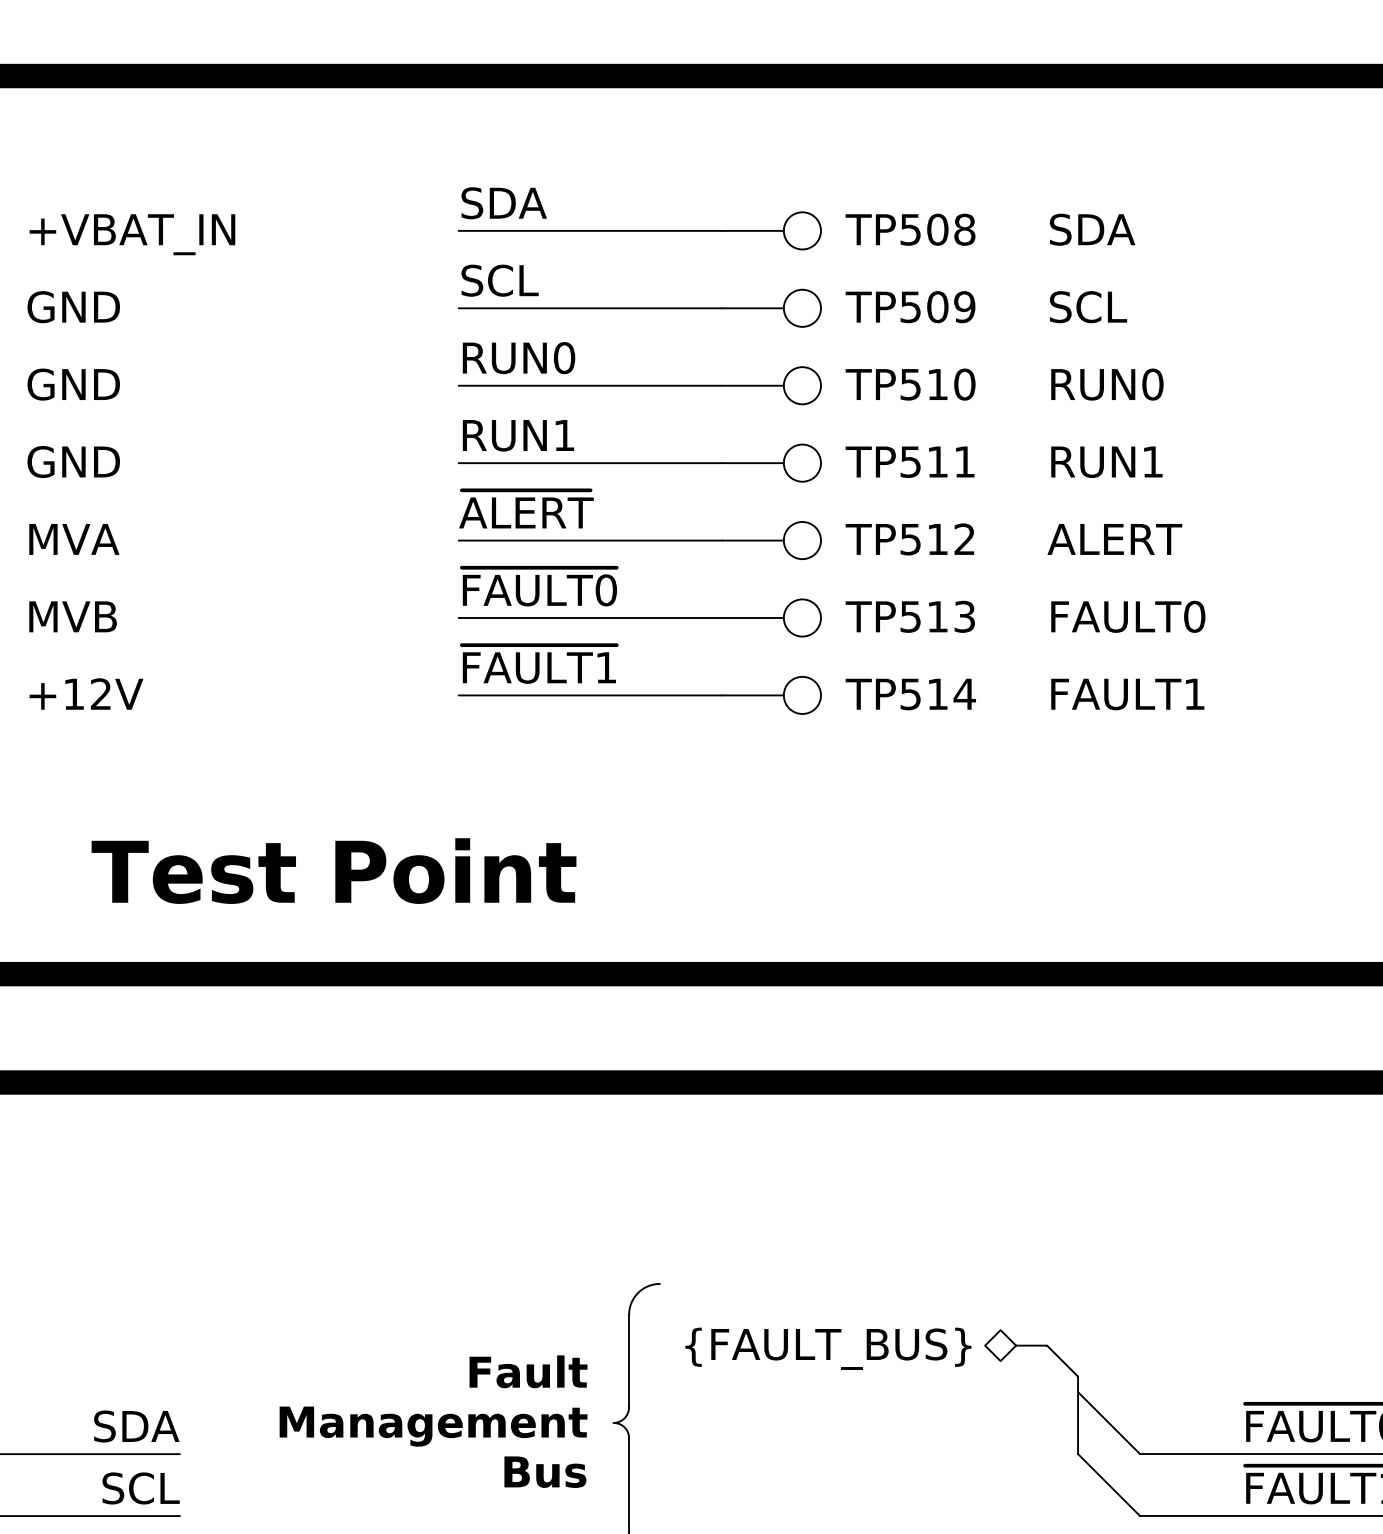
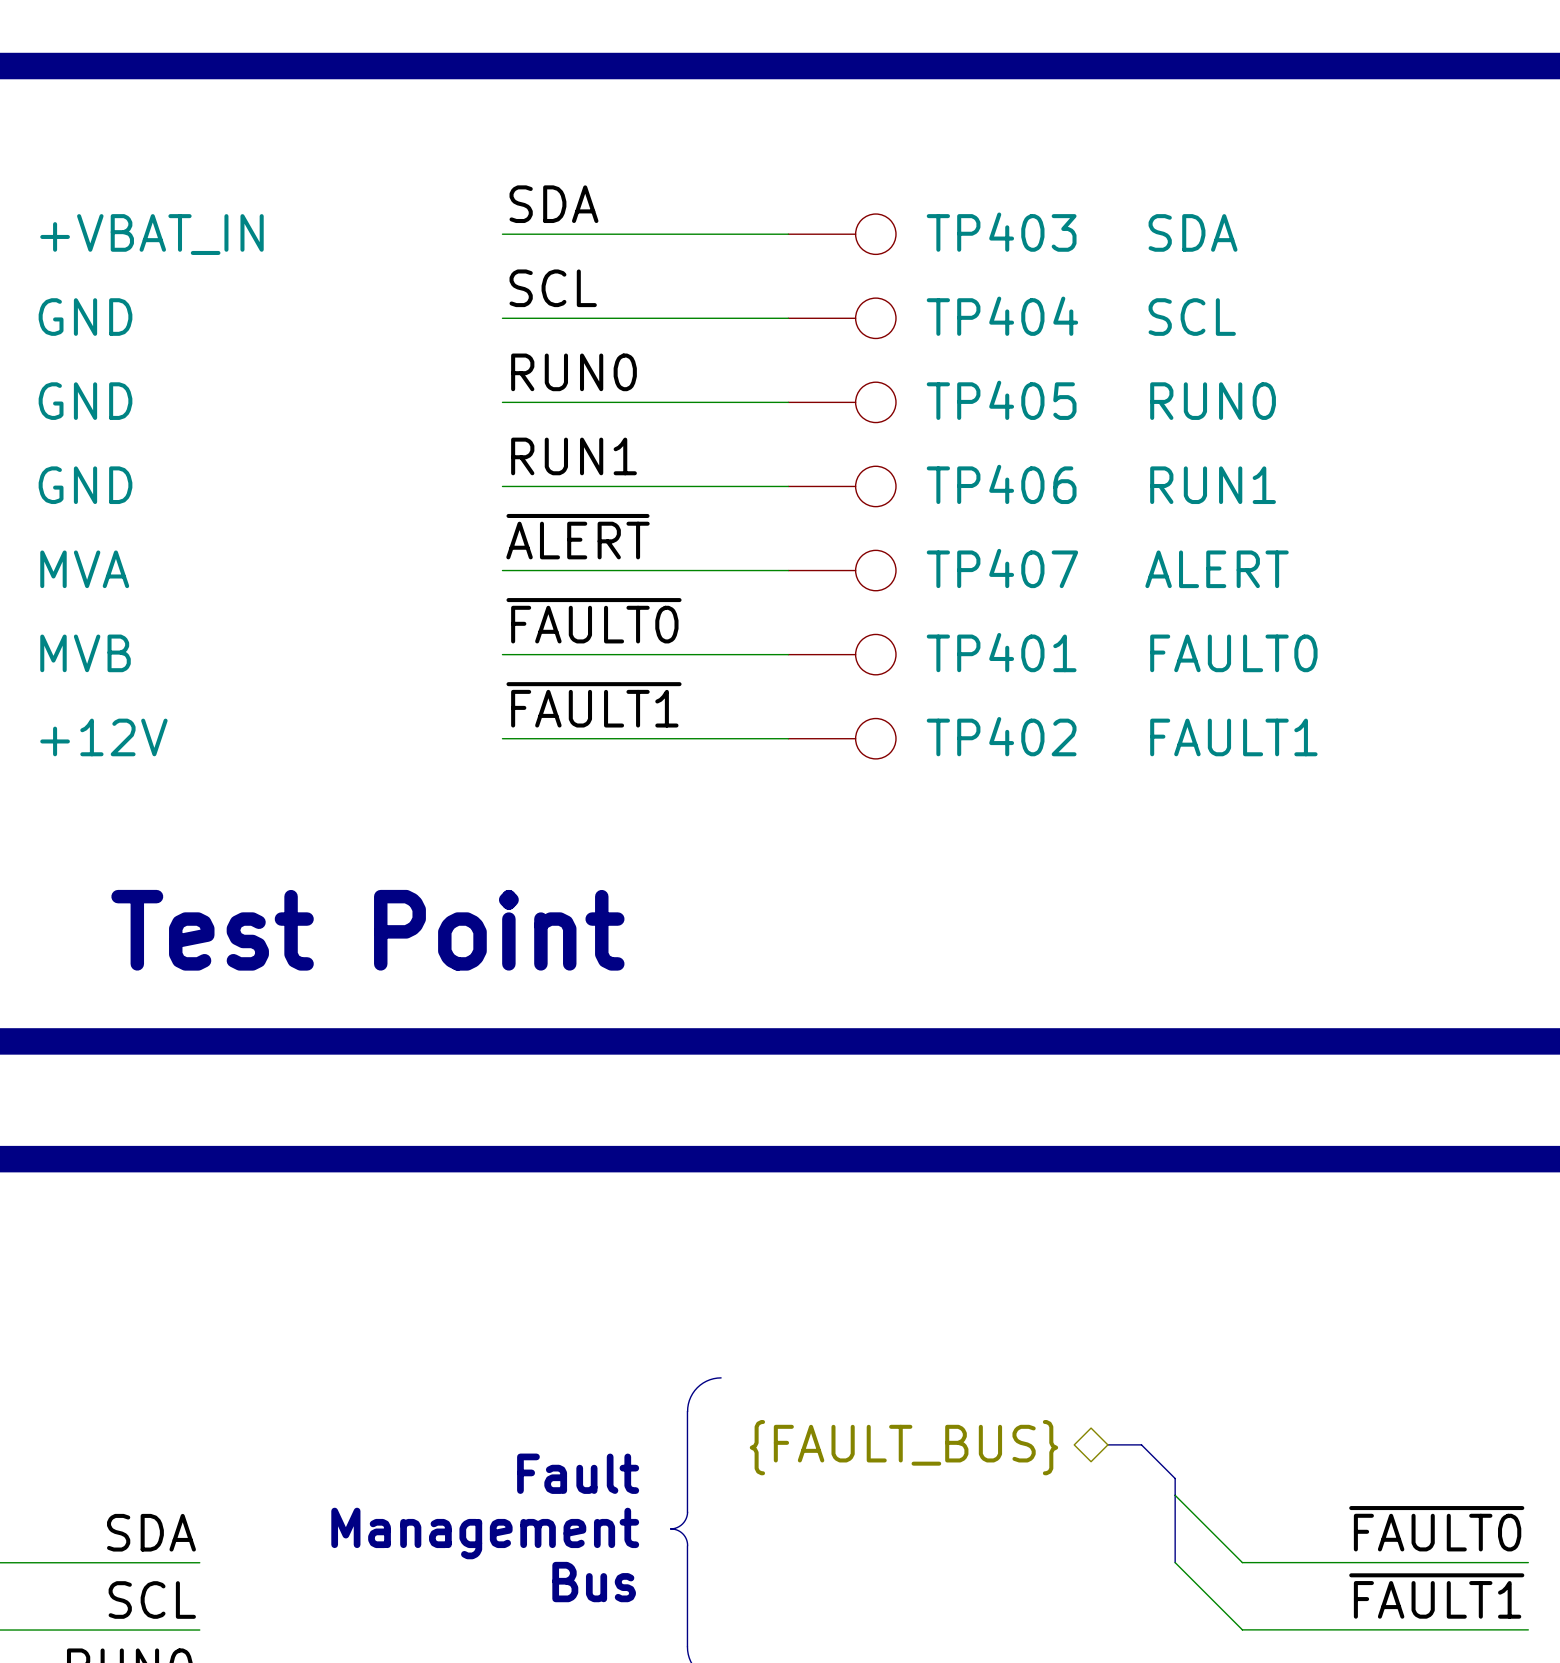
TP508 name: TP508 (910, 229) -> TP403 (1001, 232)
TP509 name: TP509 (910, 307) -> TP404 (1002, 316)
TP510 name: TP510 (910, 384) -> TP405 (1001, 400)
TP511 name: TP511 (910, 462) -> TP406 (1001, 484)
TP512 name: TP512 (909, 539) -> TP407 (1002, 568)
TP513 name: TP513 (910, 616) -> TP401 (1001, 652)
TP514 name: TP514 (910, 694) -> TP402 (1001, 736)

